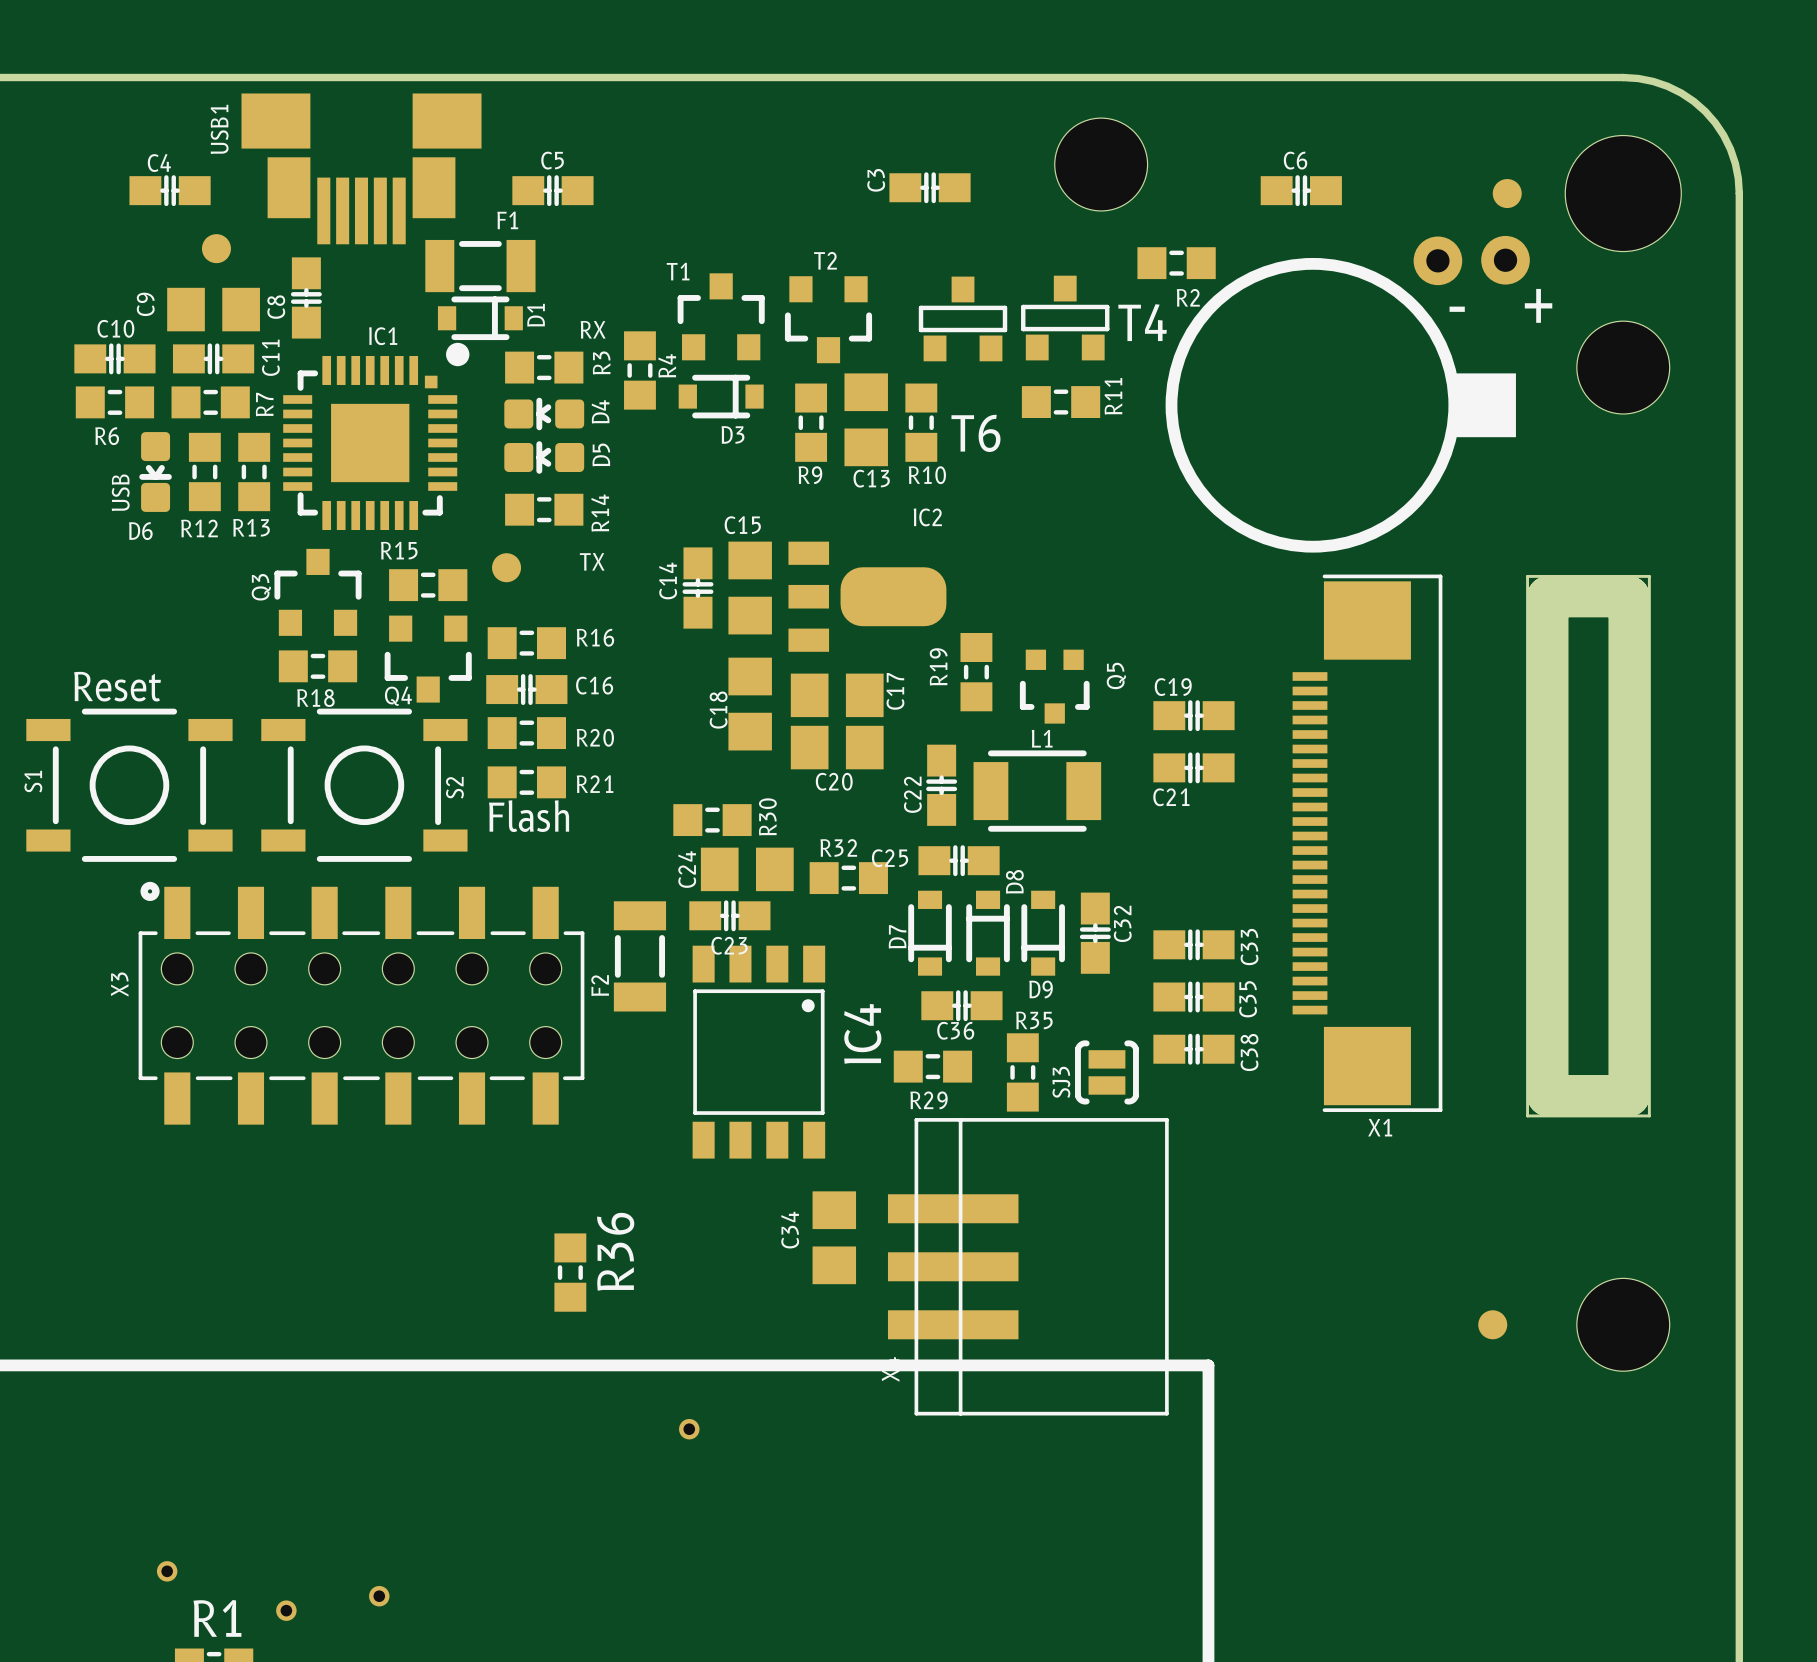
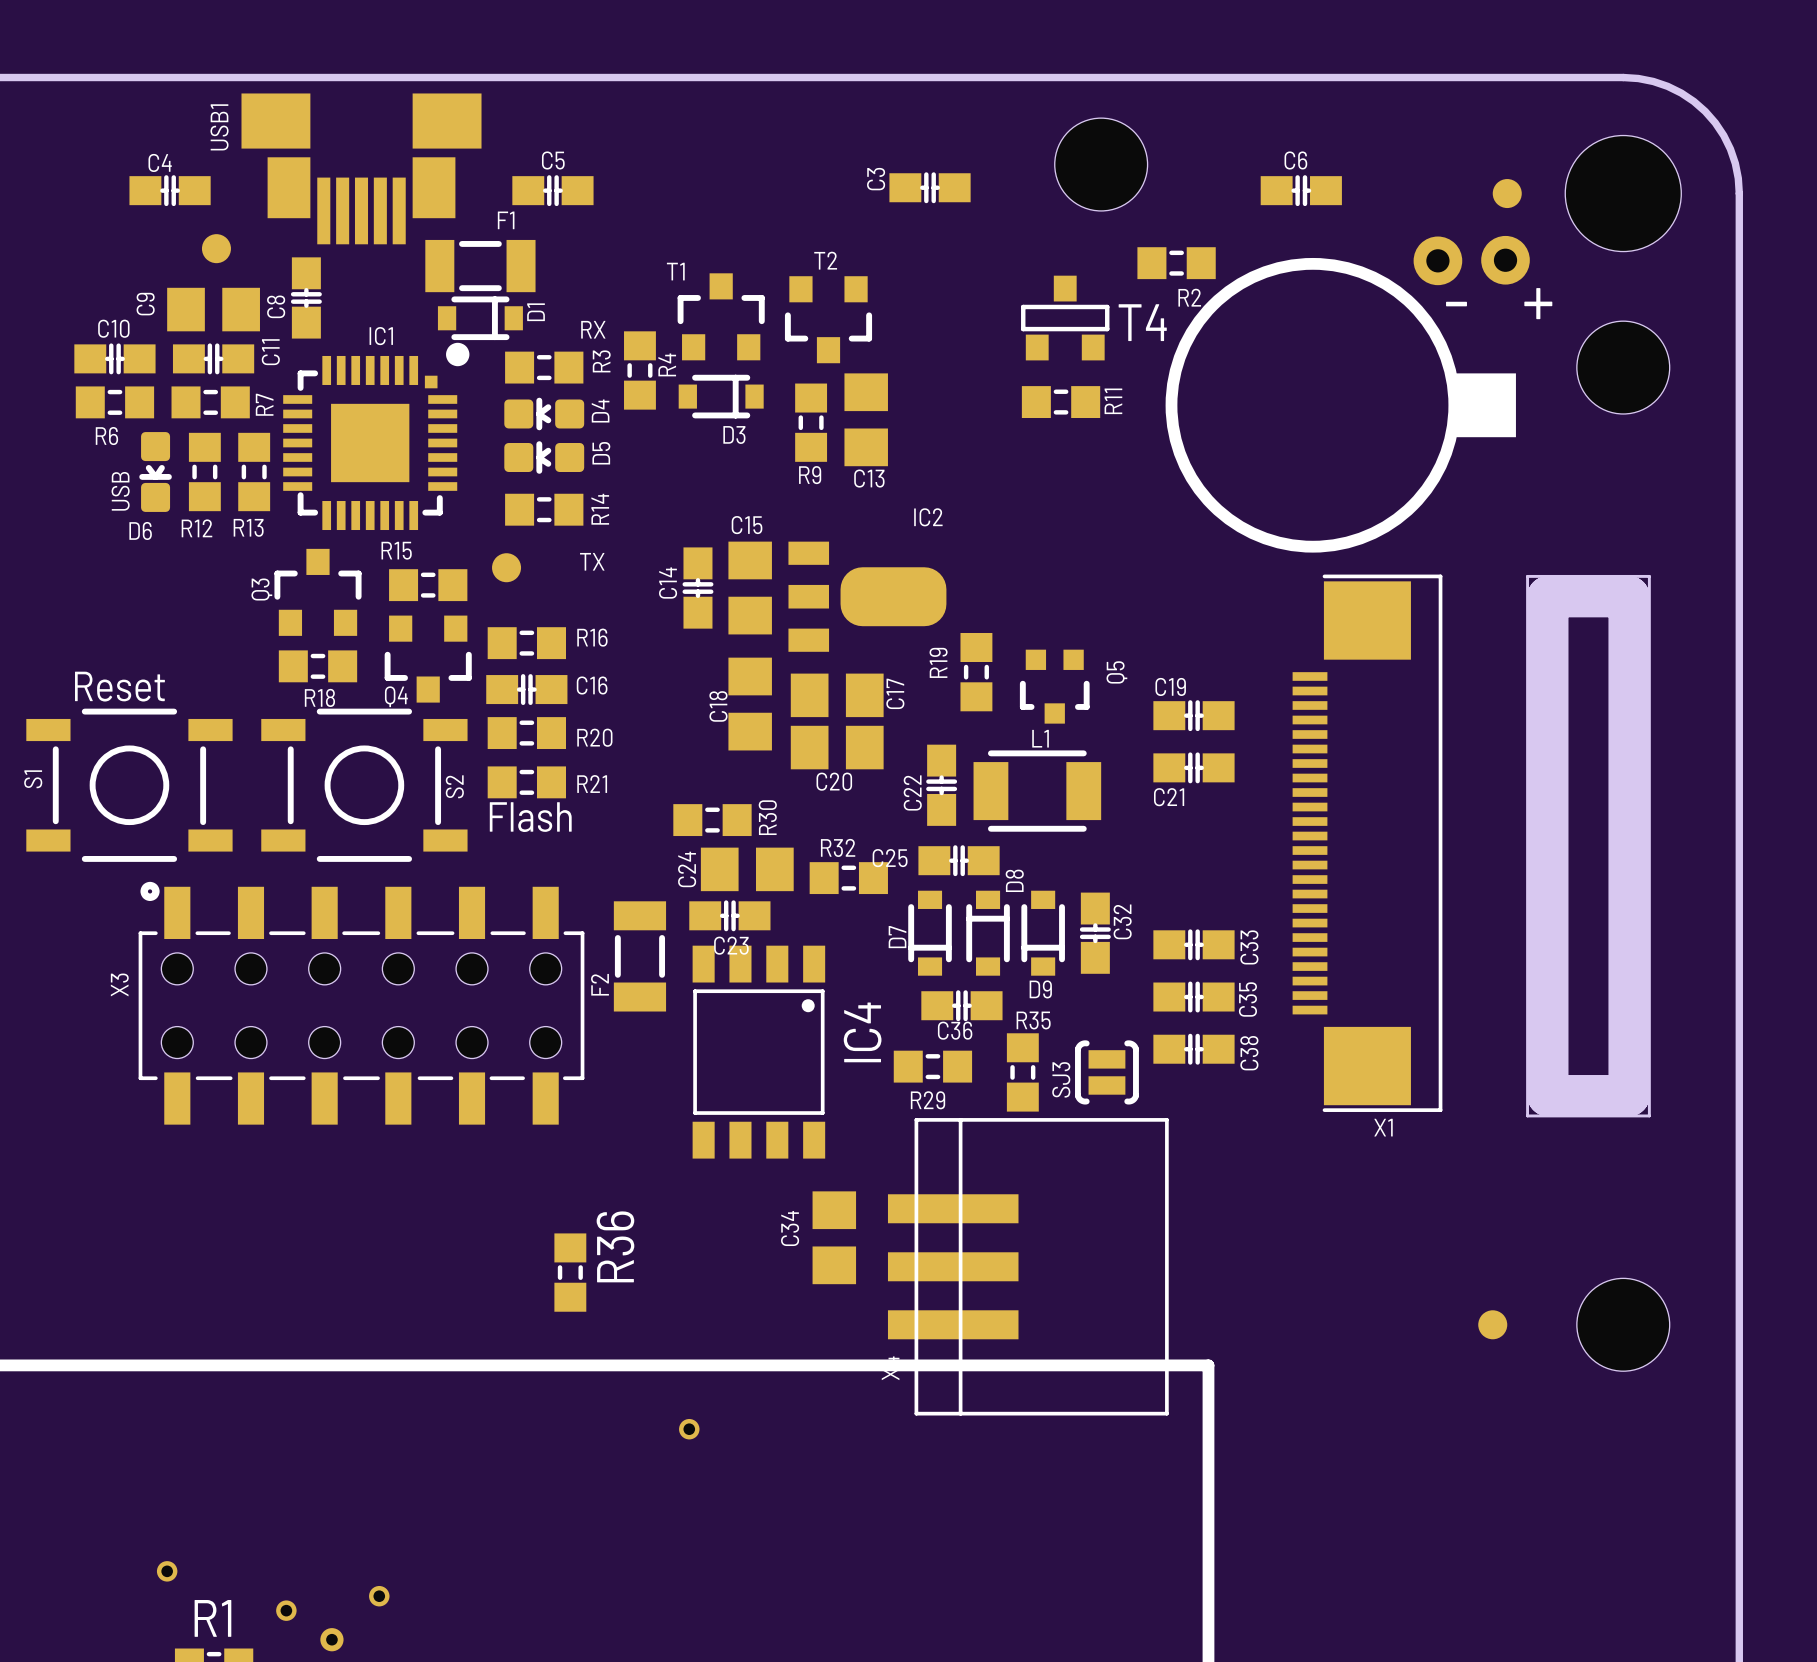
T6: (963, 318) -> none
R10: (921, 422) -> none
part: none -> (331, 1639)

